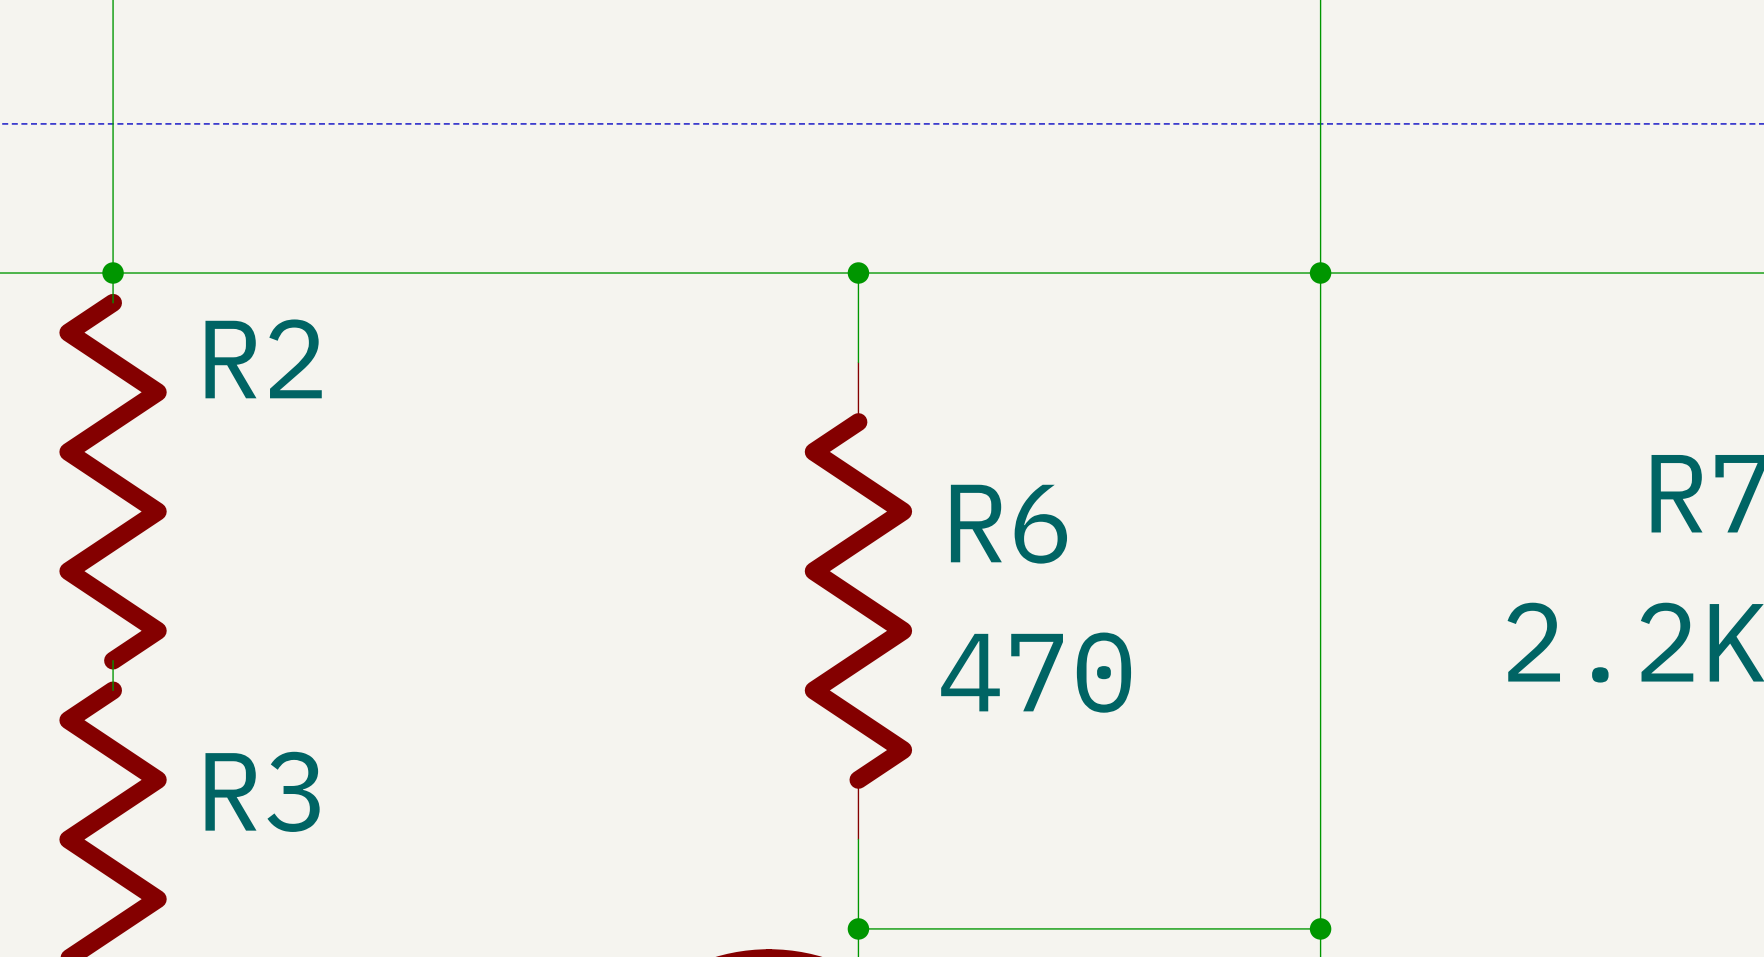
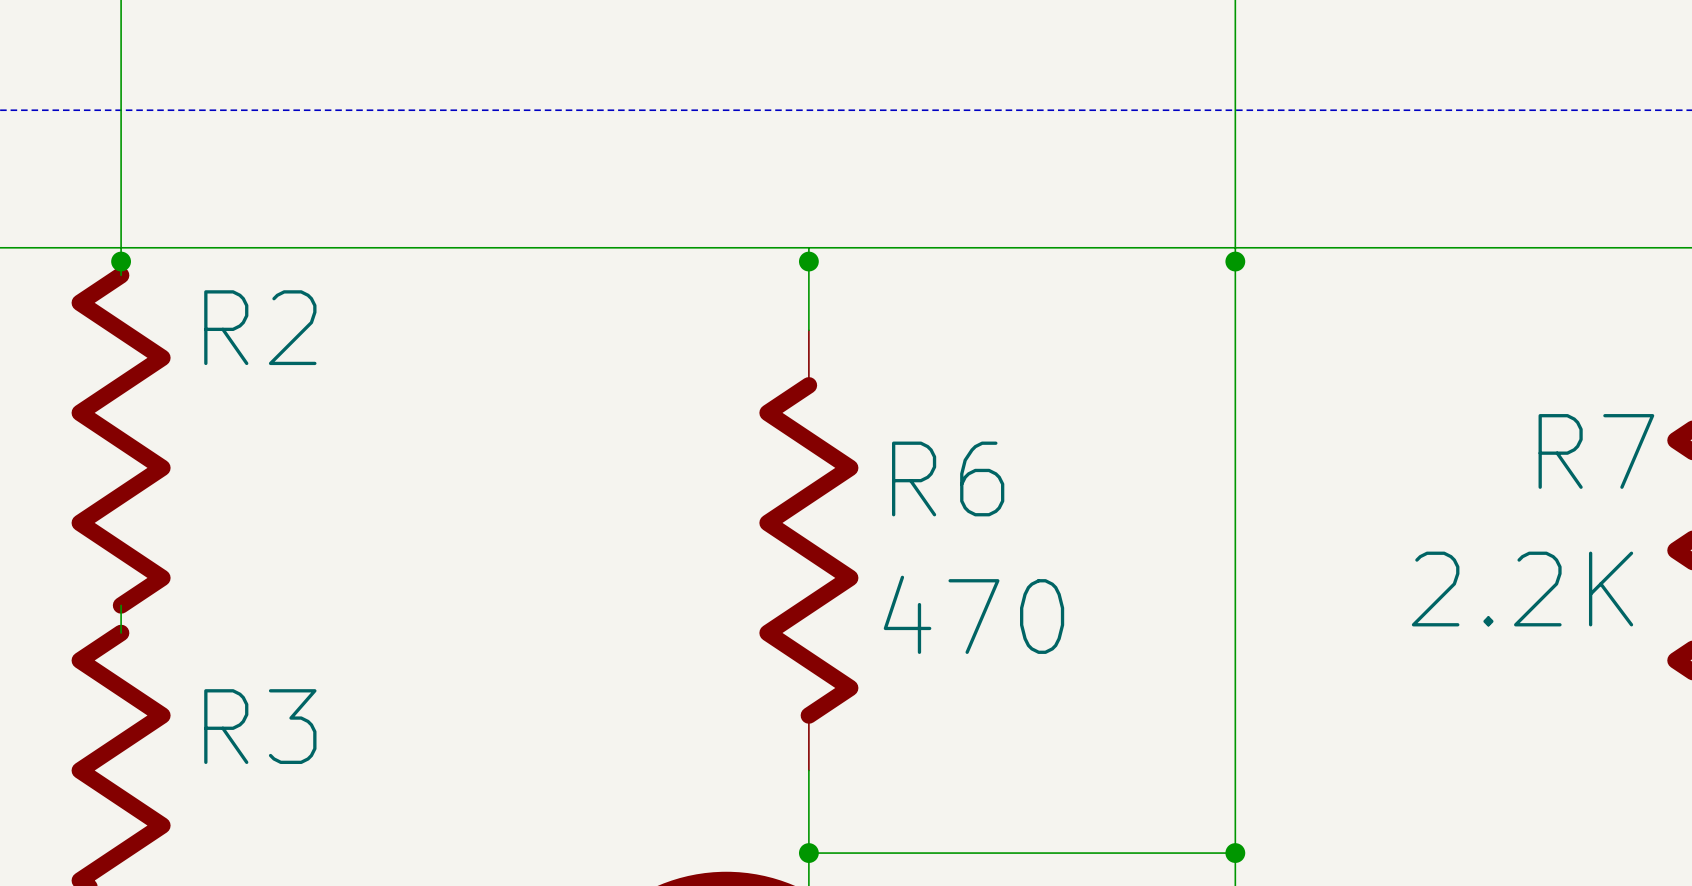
junction position: (113, 273) -> (121, 261)
junction position: (858, 273) -> (808, 261)
junction position: (1320, 273) -> (1235, 261)

